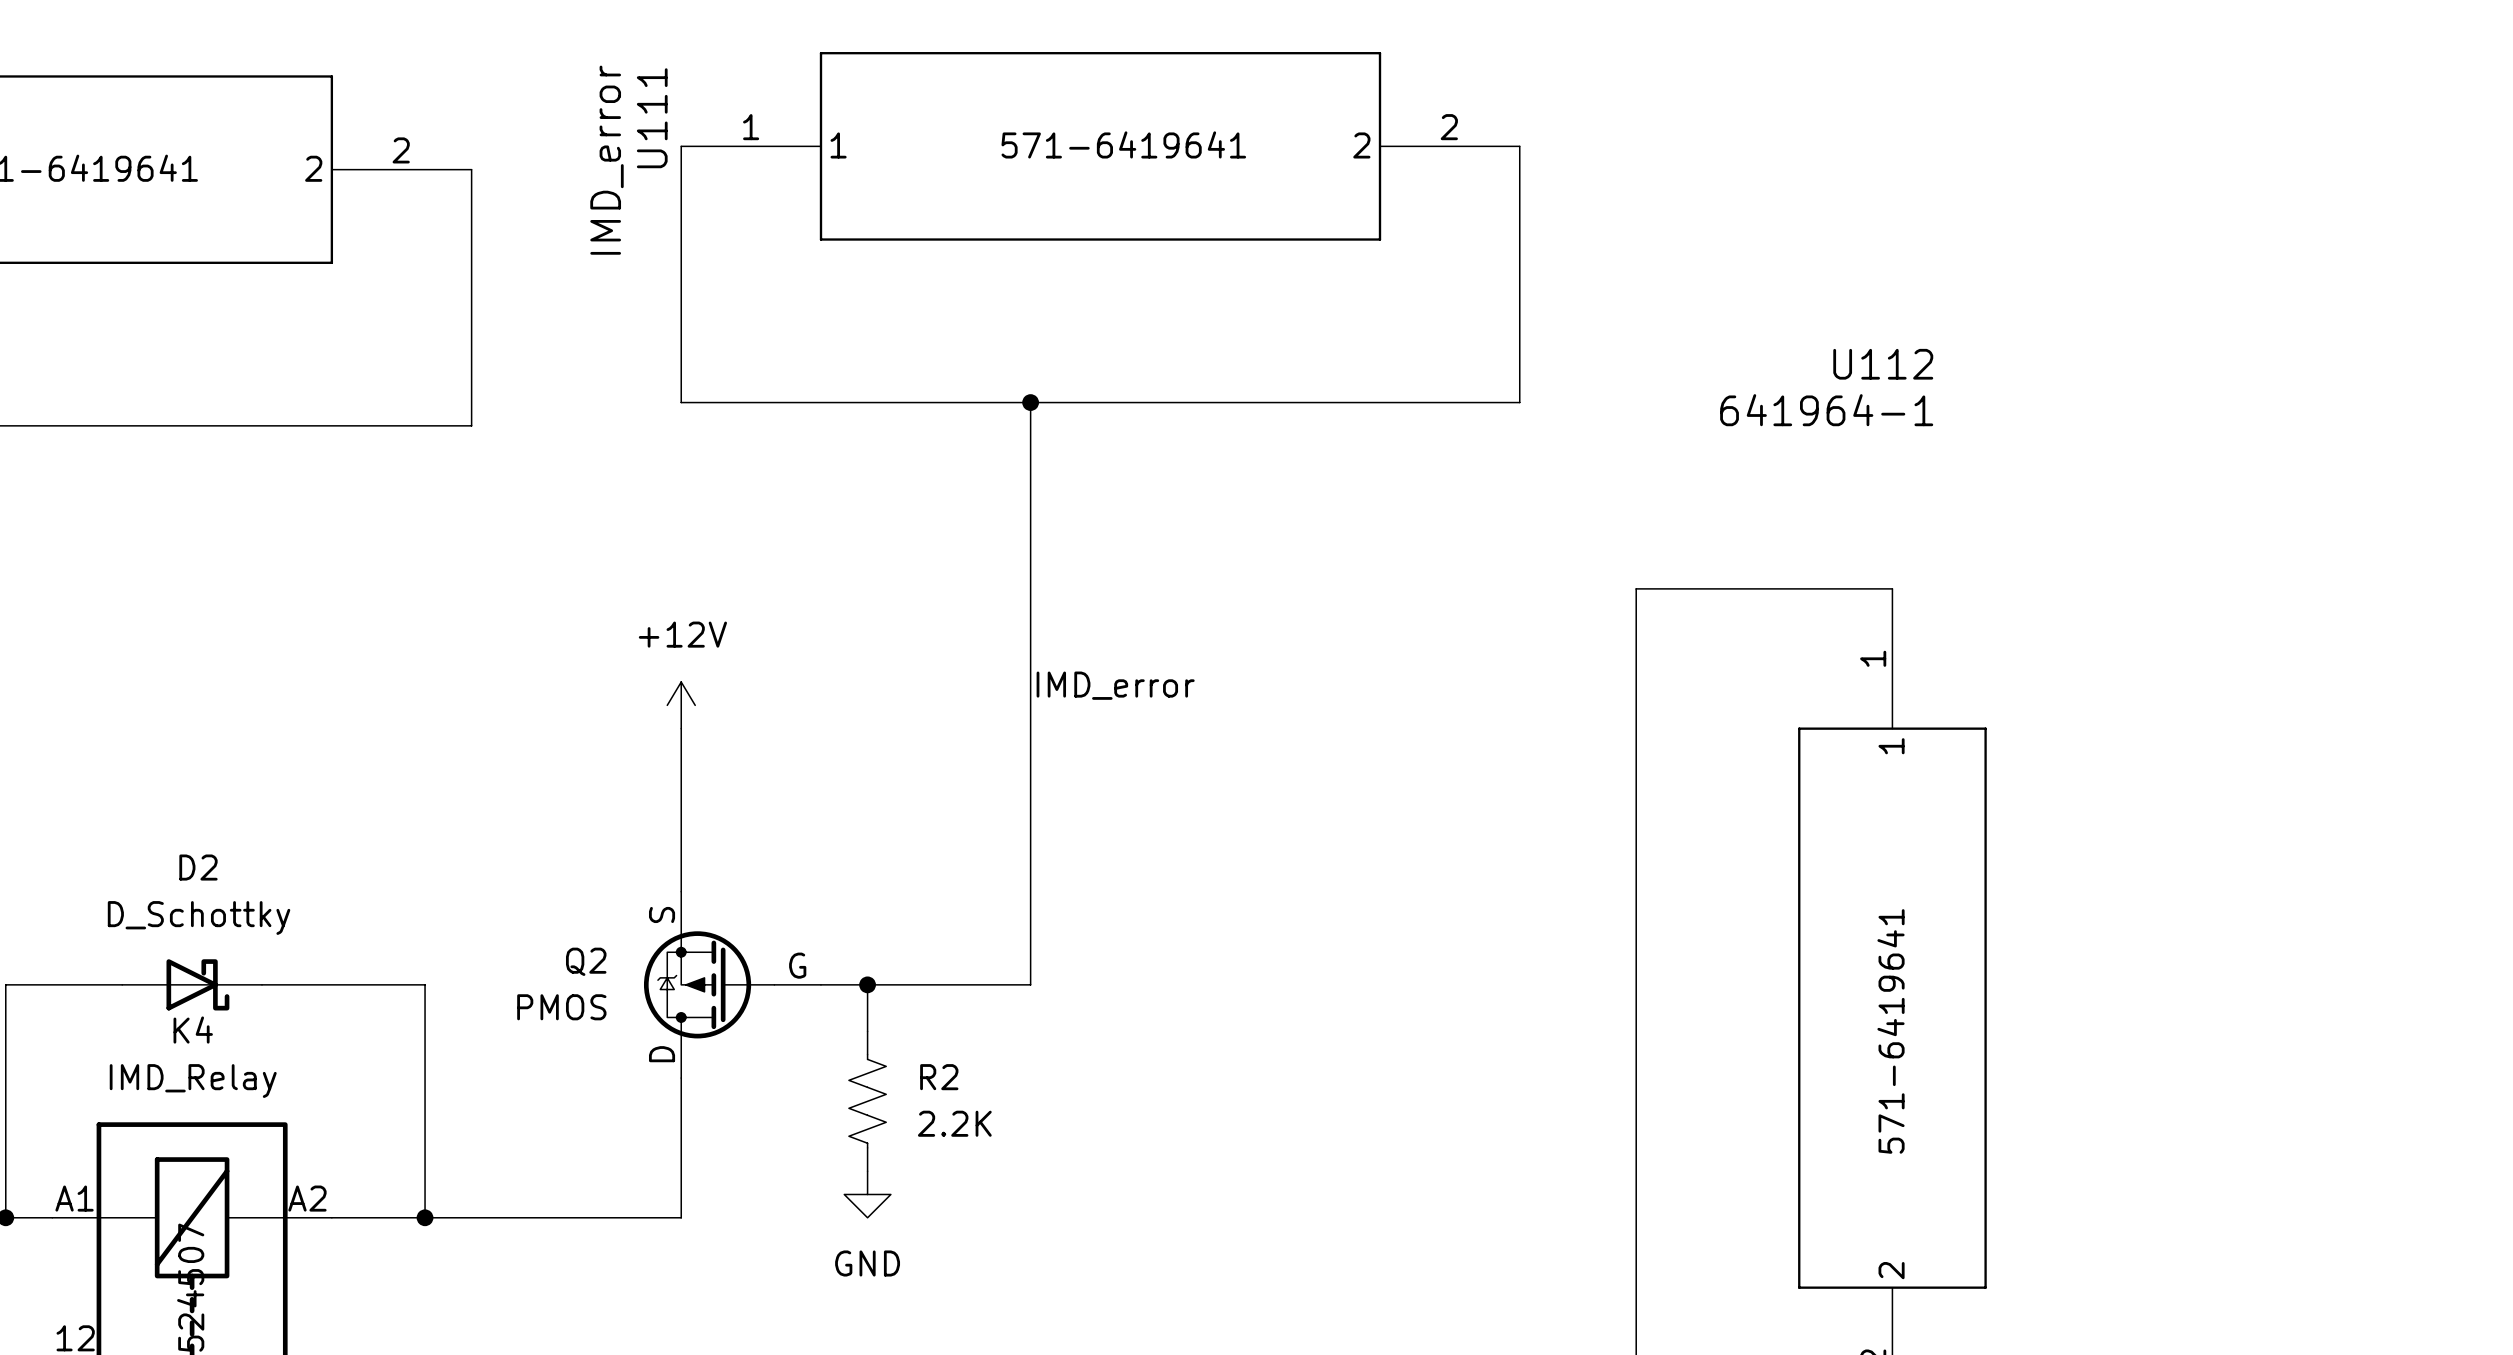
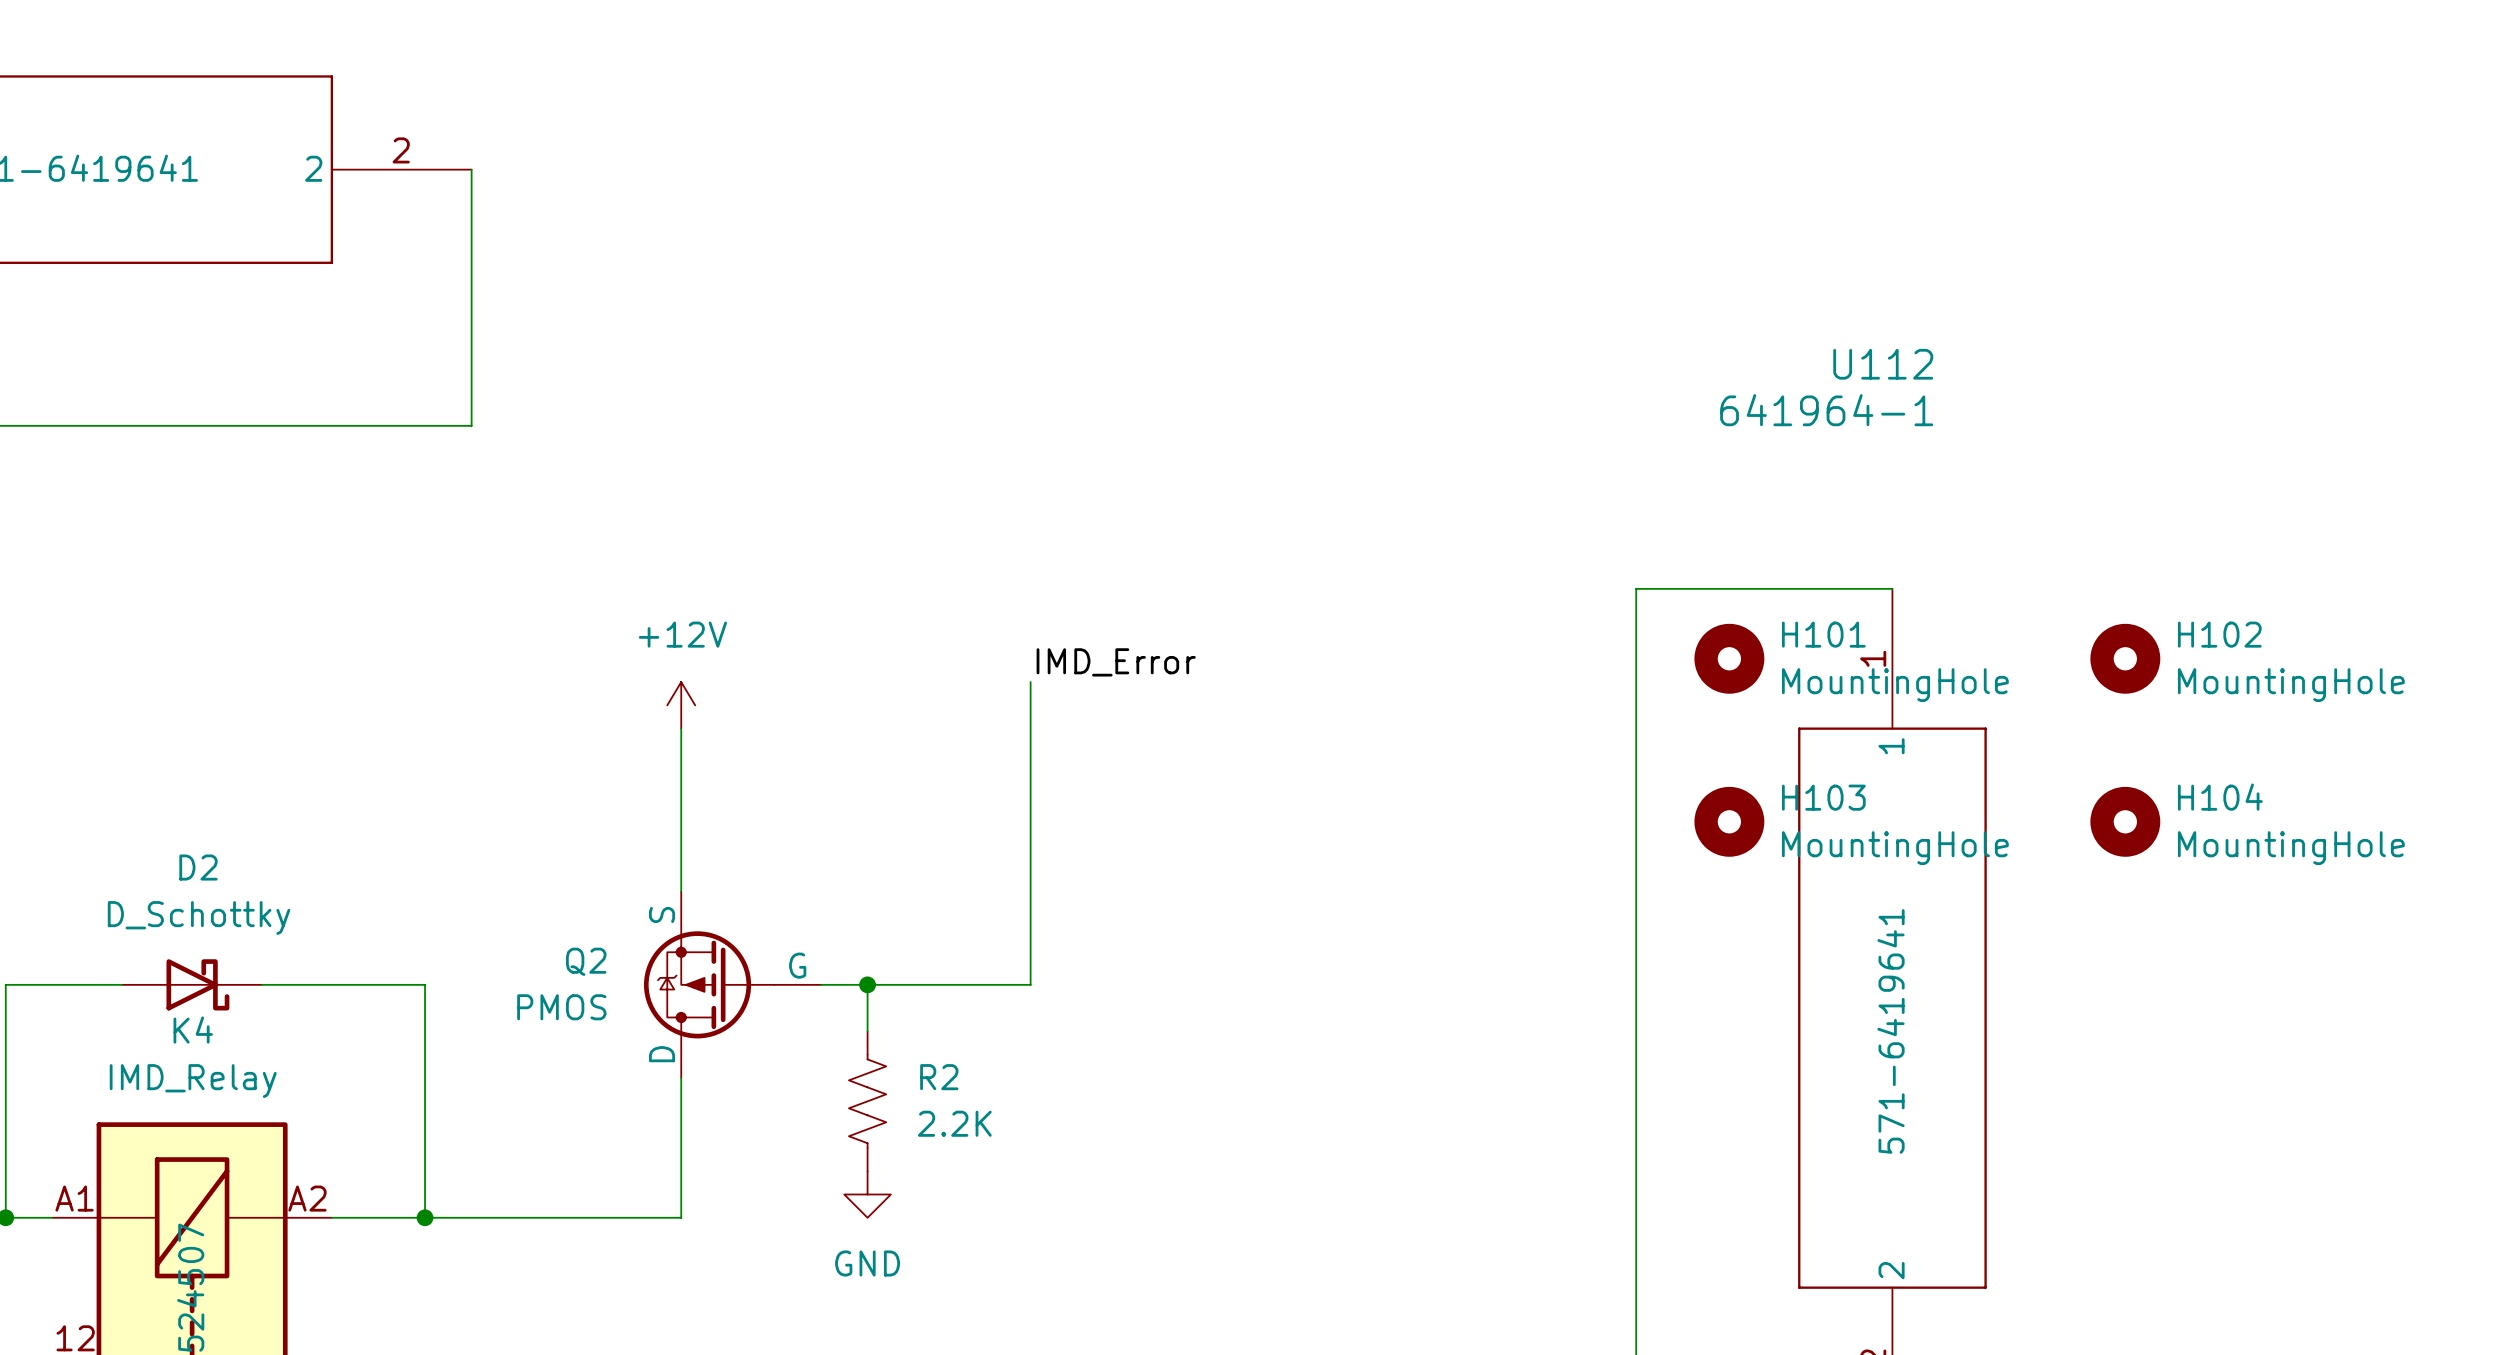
wire: (681, 146) (681, 402) (1519, 402) (1519, 146) -> none
U111: IMD_error (1100, 146) -> none
wire: (1030, 402) (1030, 682) -> none
junction: (1030, 402) -> none
H101: none -> MountingHole (1729, 658)
H102: none -> MountingHole (2125, 658)
label: IMD_error (1115, 685) -> IMD_Error (1116, 662)
H103: none -> MountingHole (1729, 821)
H104: none -> MountingHole (2125, 821)

